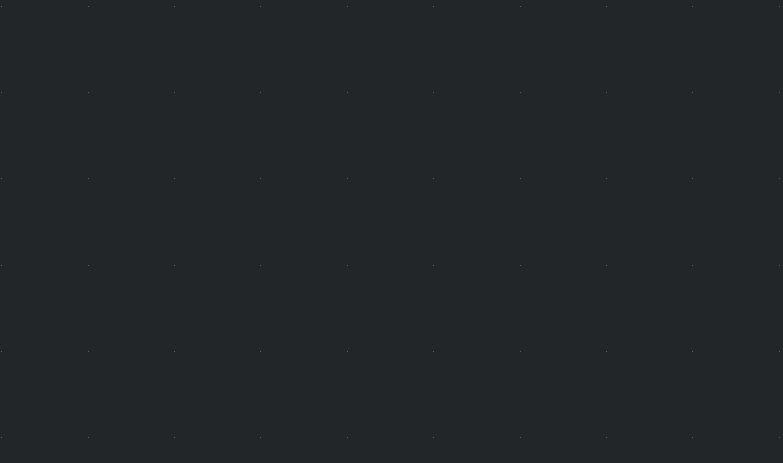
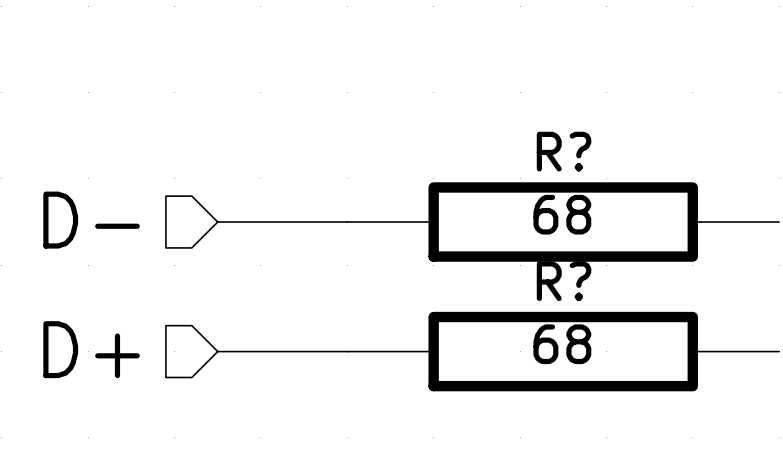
hierarchical label: none -> D- (91, 220)
wire: none -> (217, 222) (347, 222)
R?: none -> 68 (563, 222)
hierarchical label: none -> D+ (91, 349)
wire: none -> (217, 351) (347, 351)
R?: none -> 68 (563, 351)

